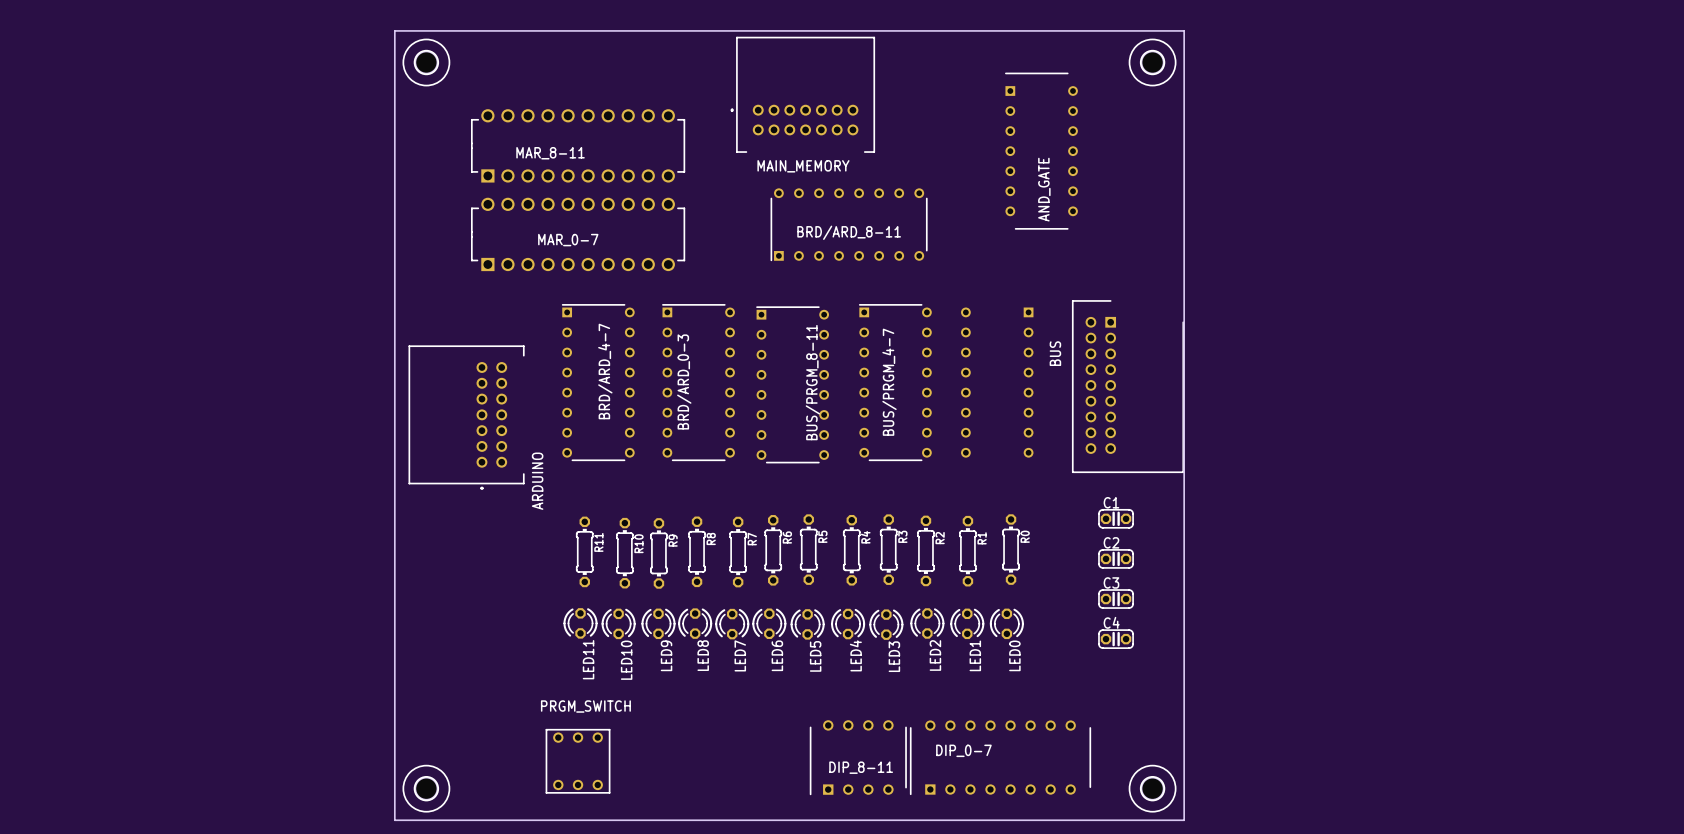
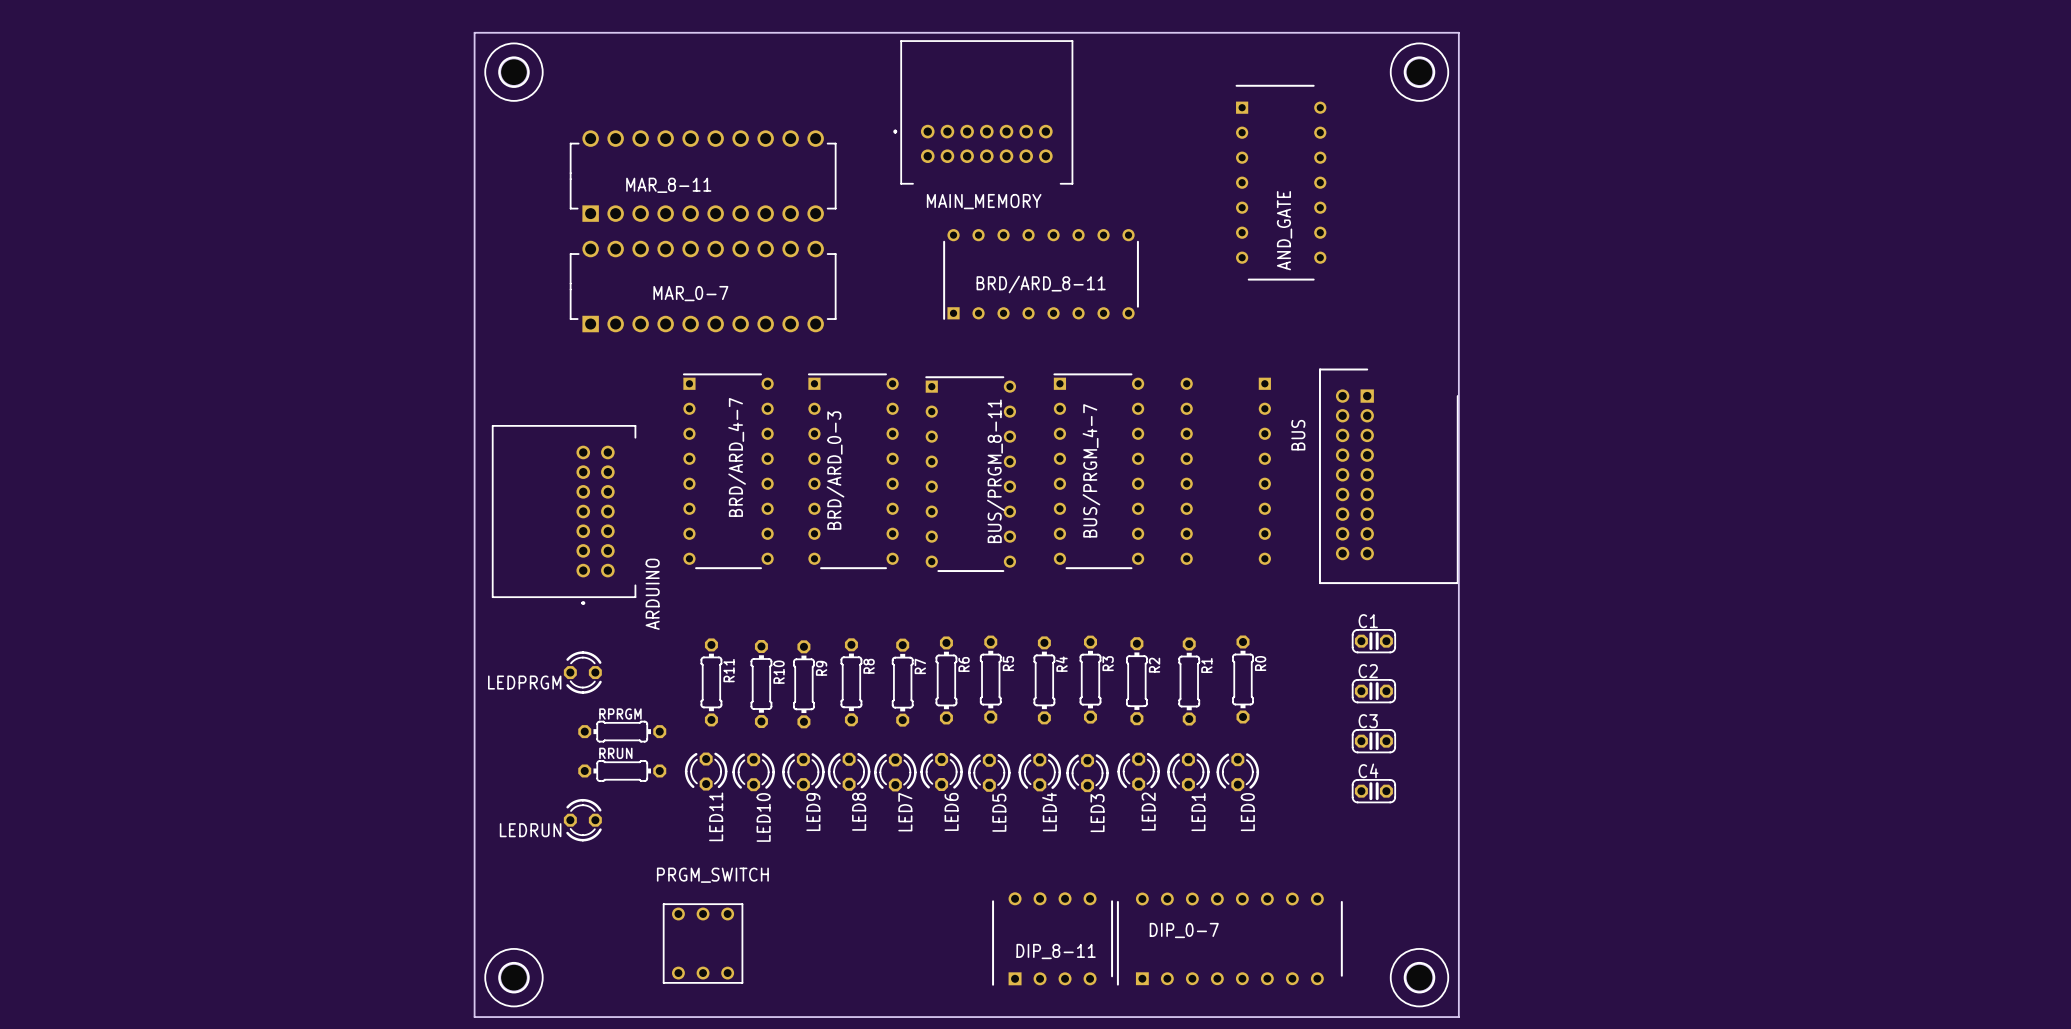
LEDPRGM: none -> (582, 672)
RPRGM: none -> (622, 731)
RRUN: none -> (622, 770)
LEDRUN: none -> (582, 820)

